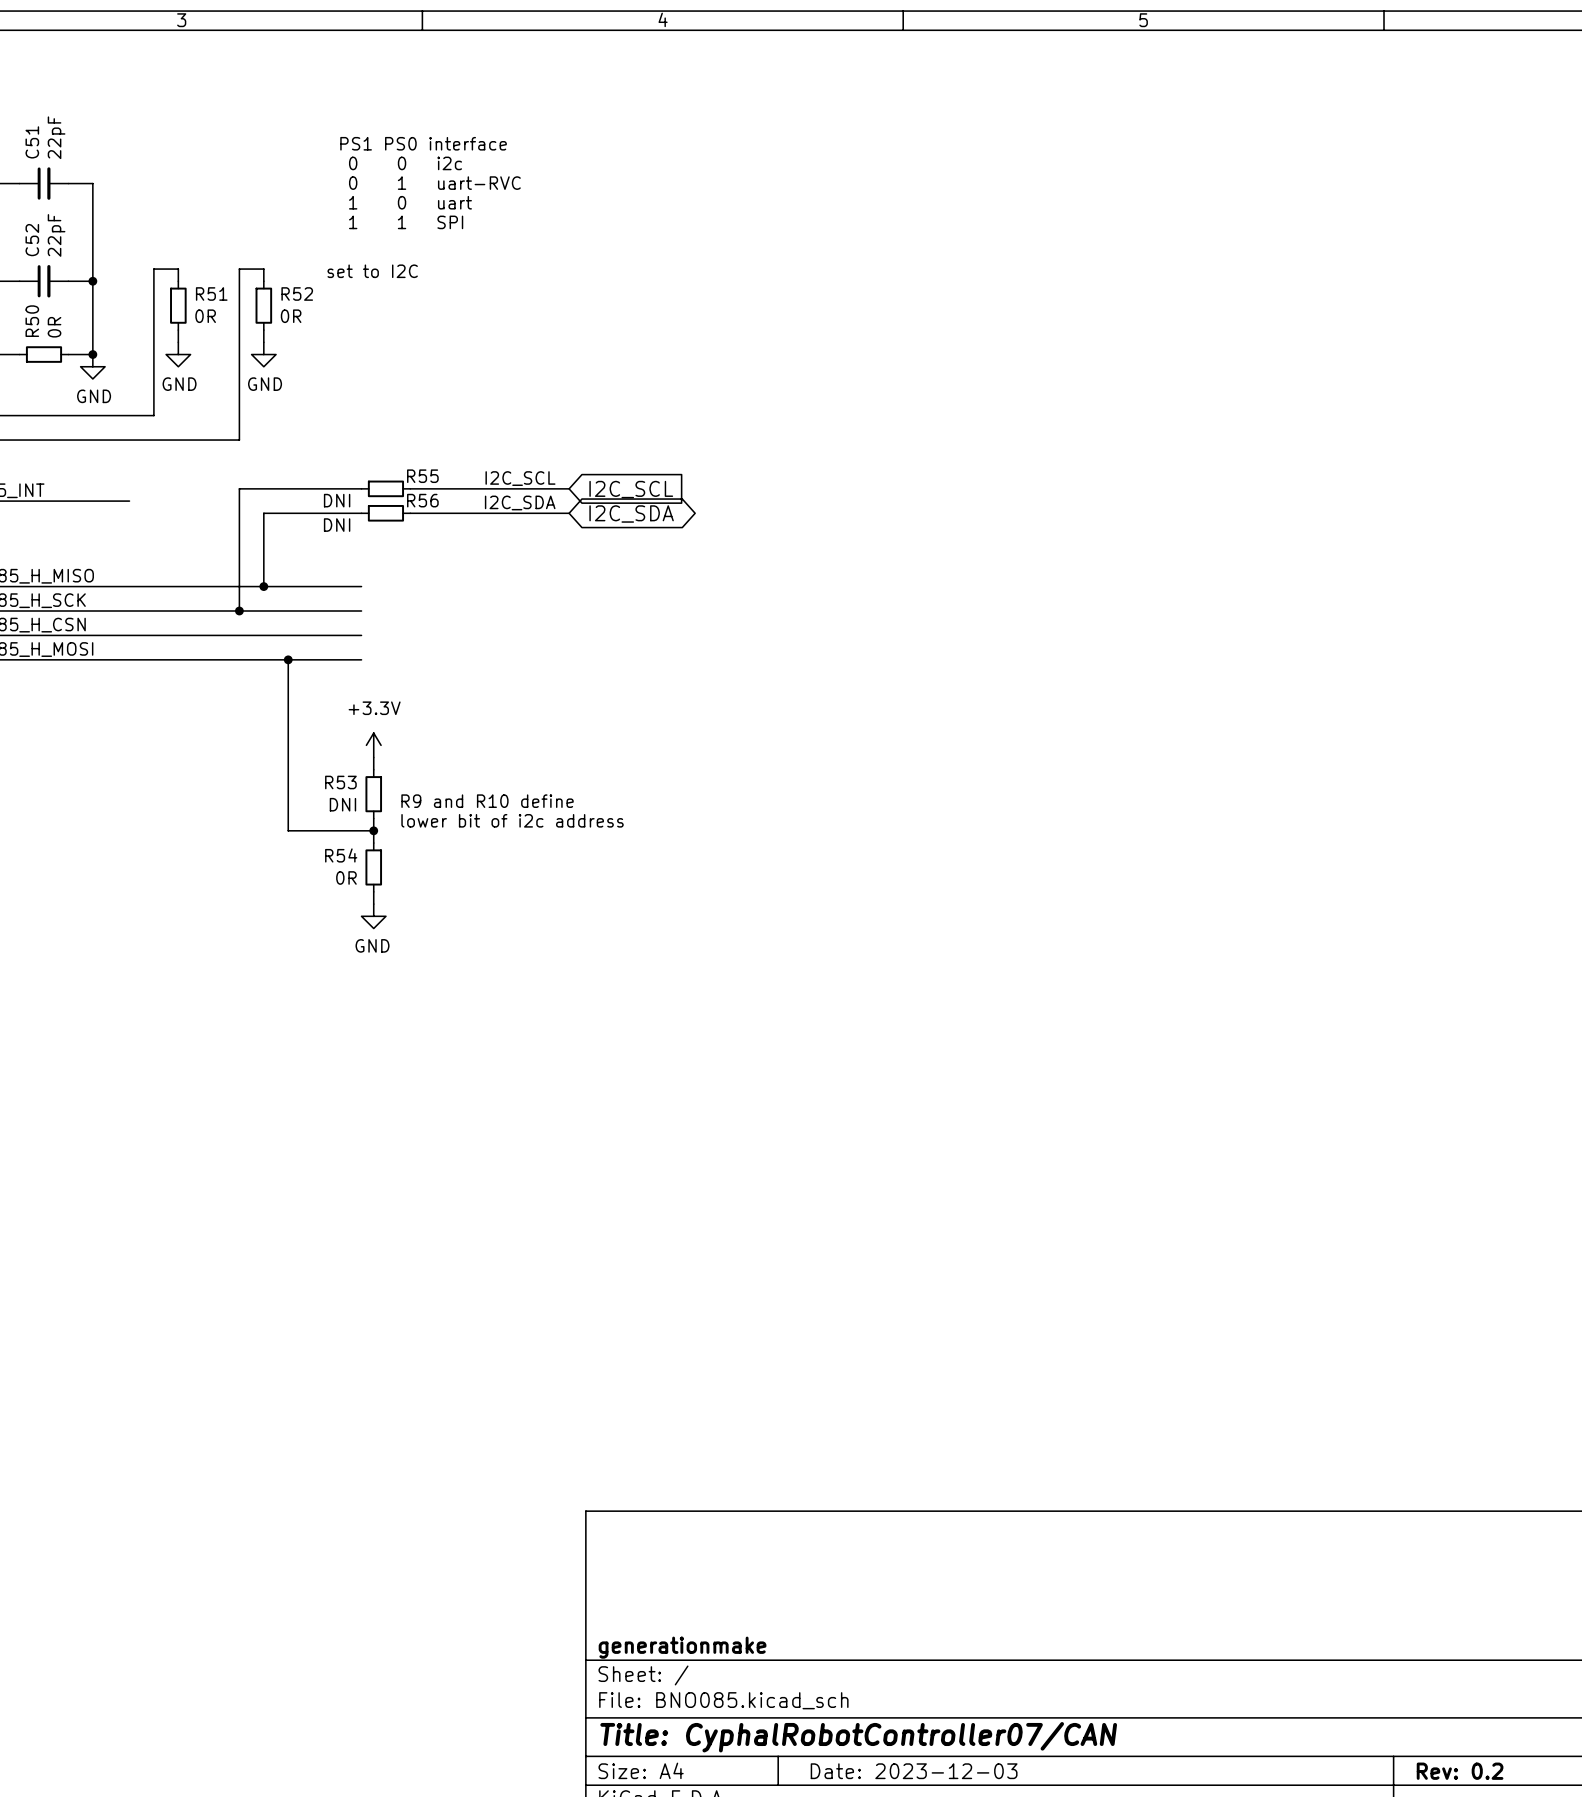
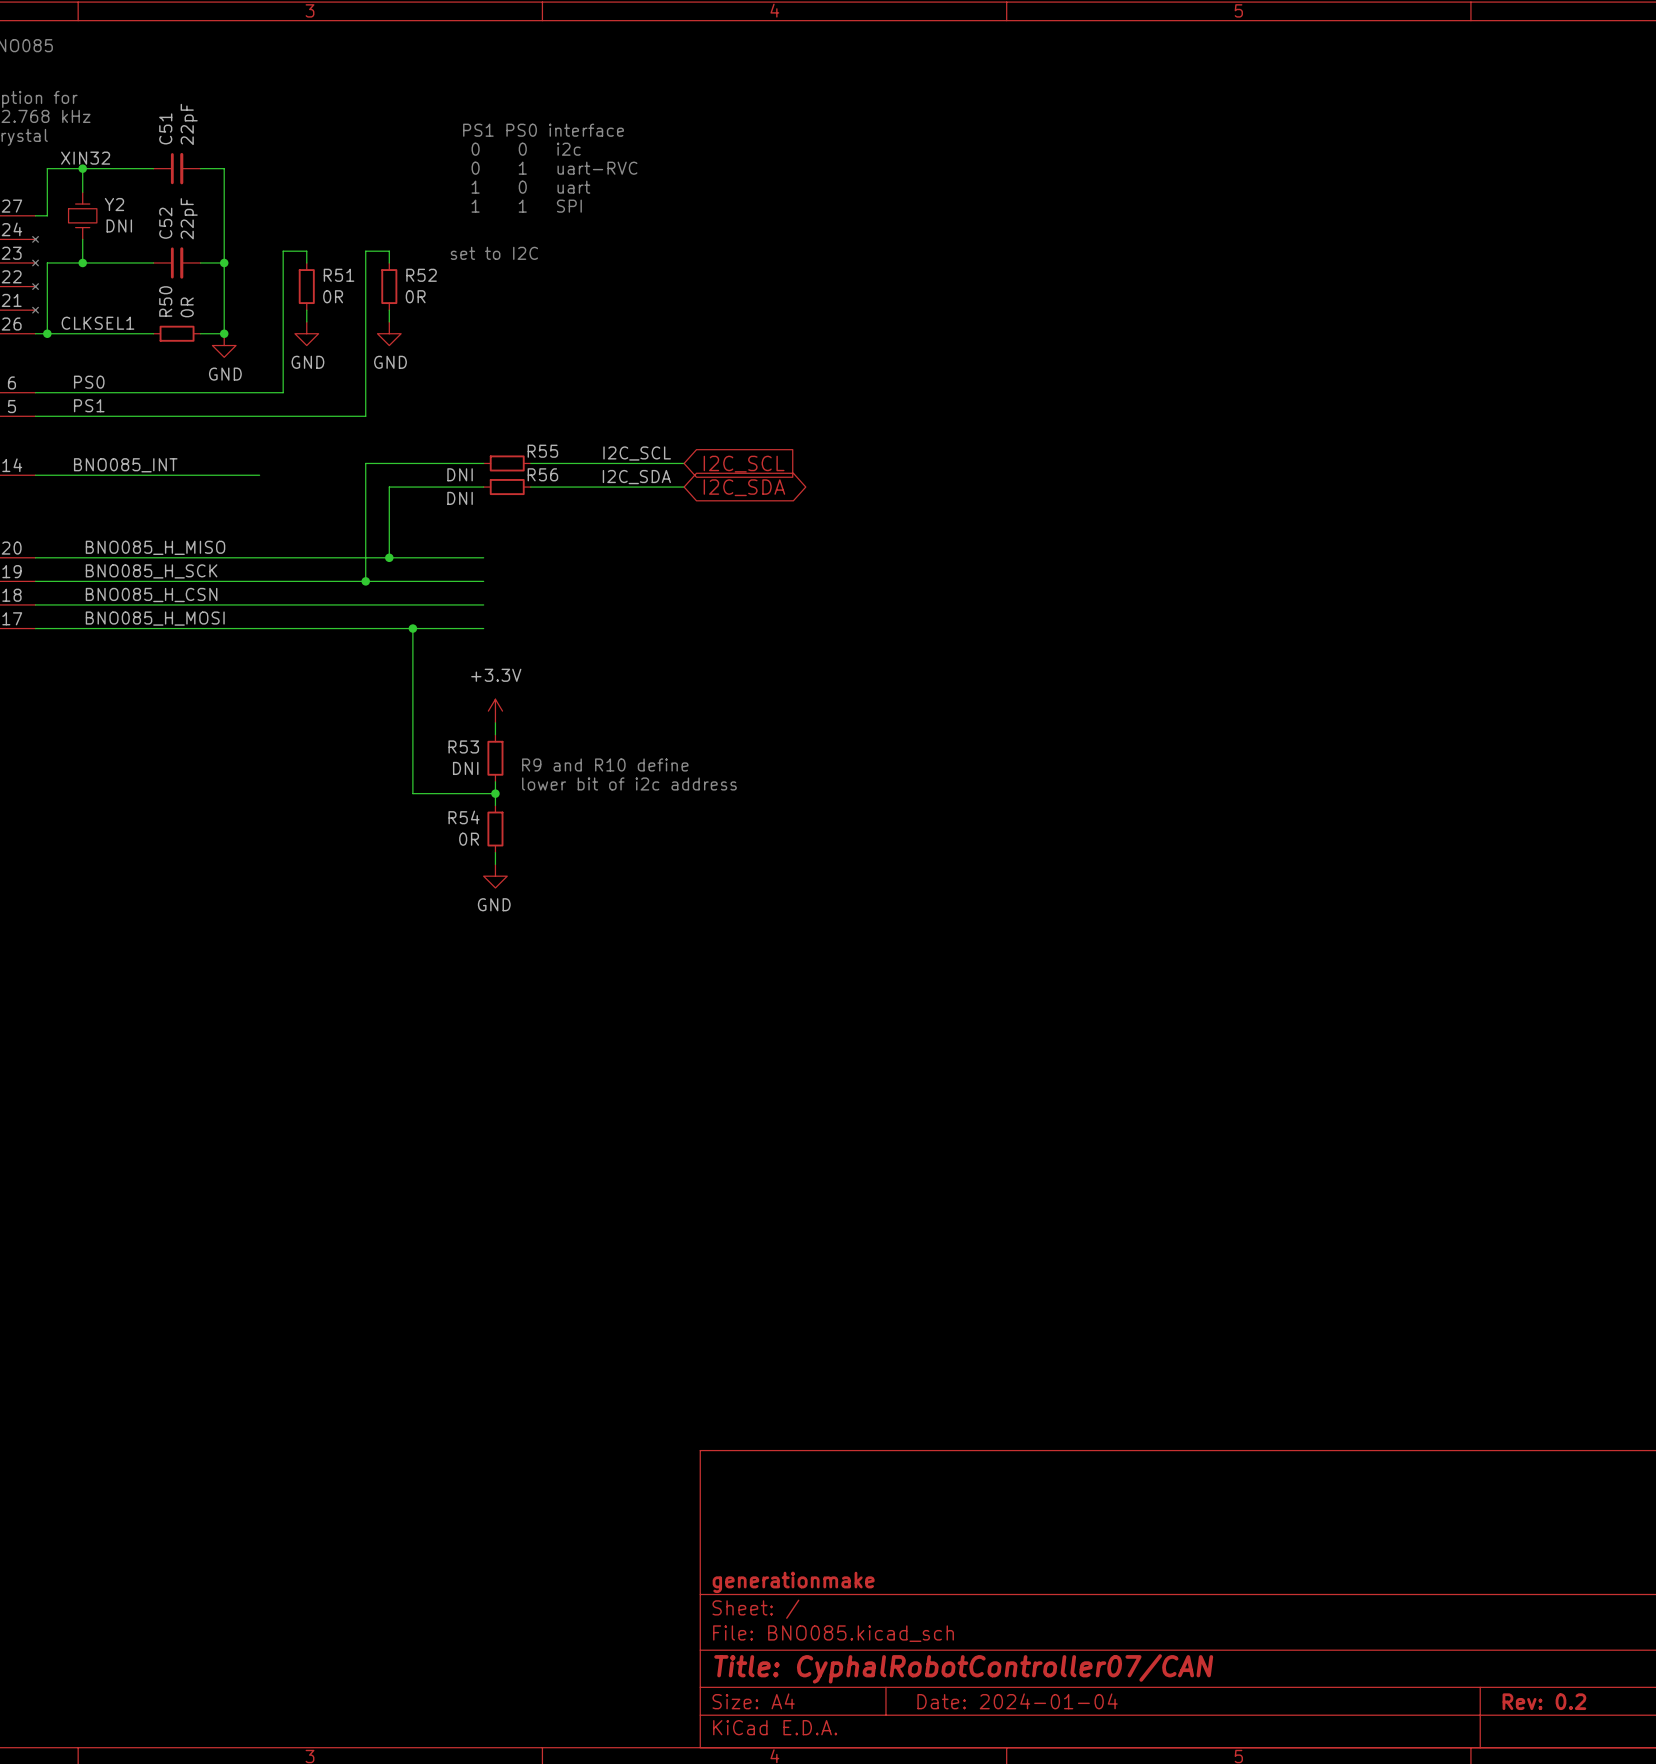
title block: Date: 2023-12-03 (914, 1771) -> Date: 2024-01-04 (1017, 1701)

